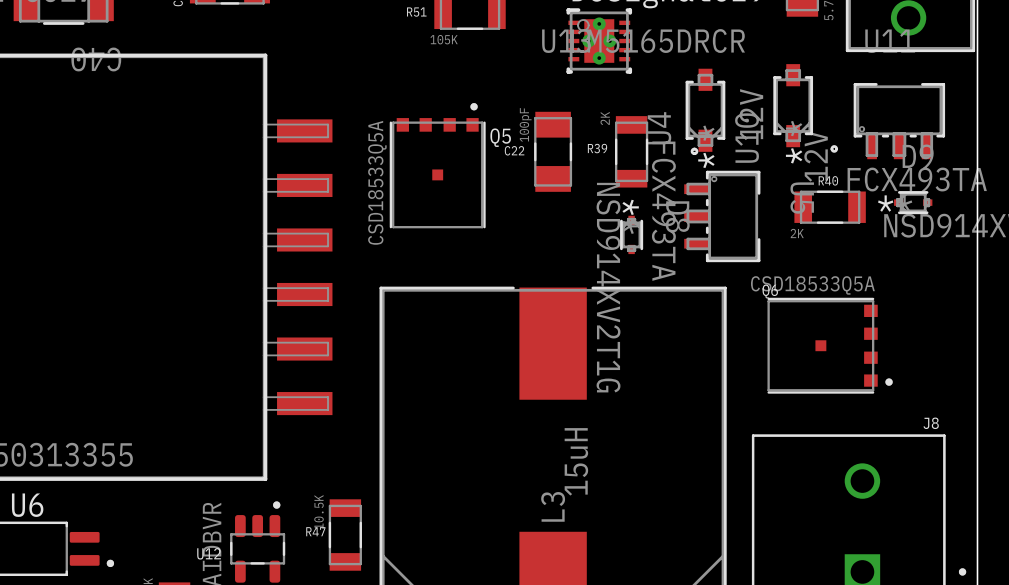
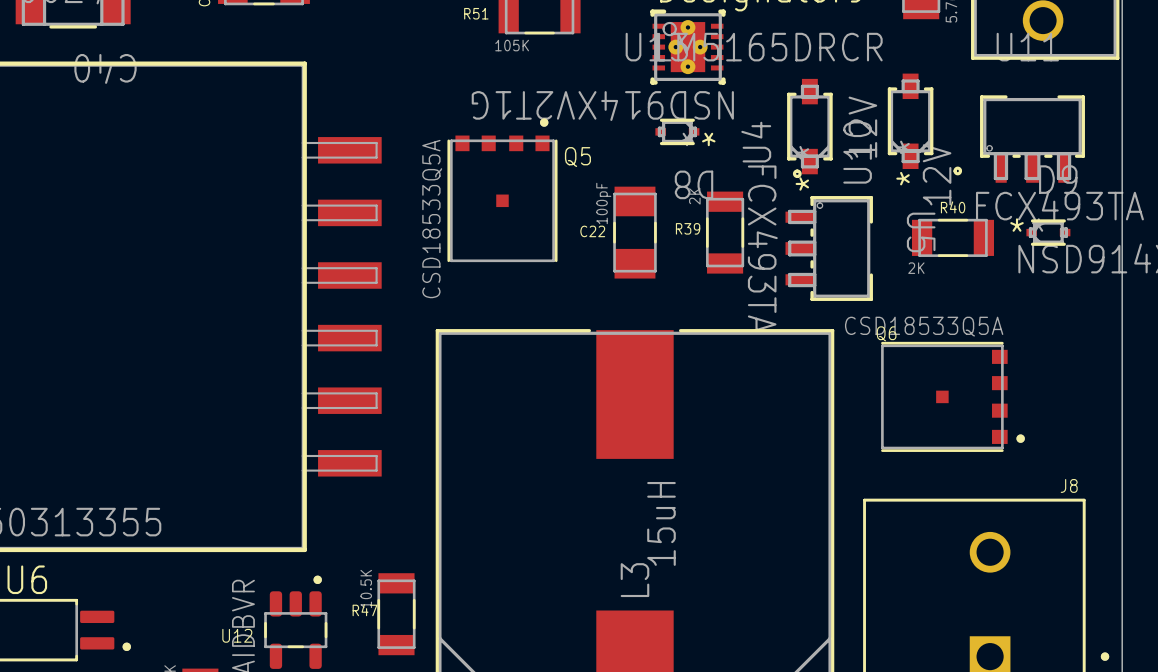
C22 position: (553, 151) -> (634, 232)
R39 position: (631, 151) -> (725, 232)
D8 rotation: 0° (631, 234) -> 90° clockwise (677, 131)
D8 position: (631, 234) -> (677, 131)

